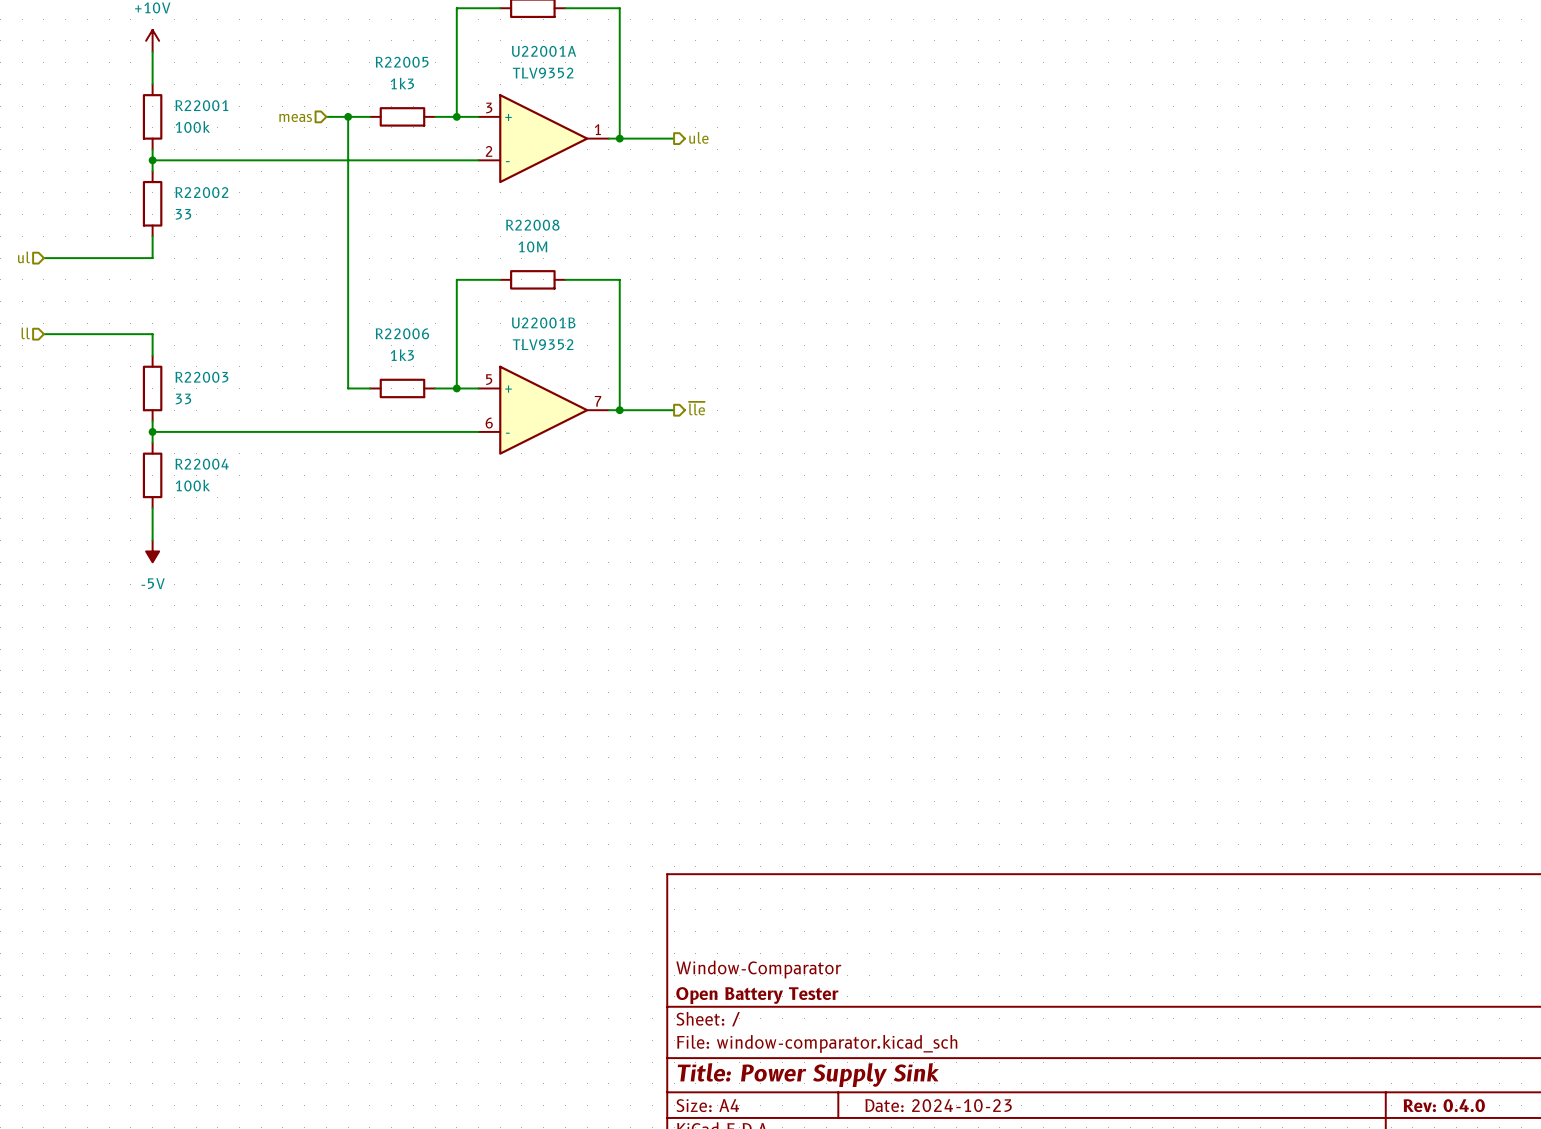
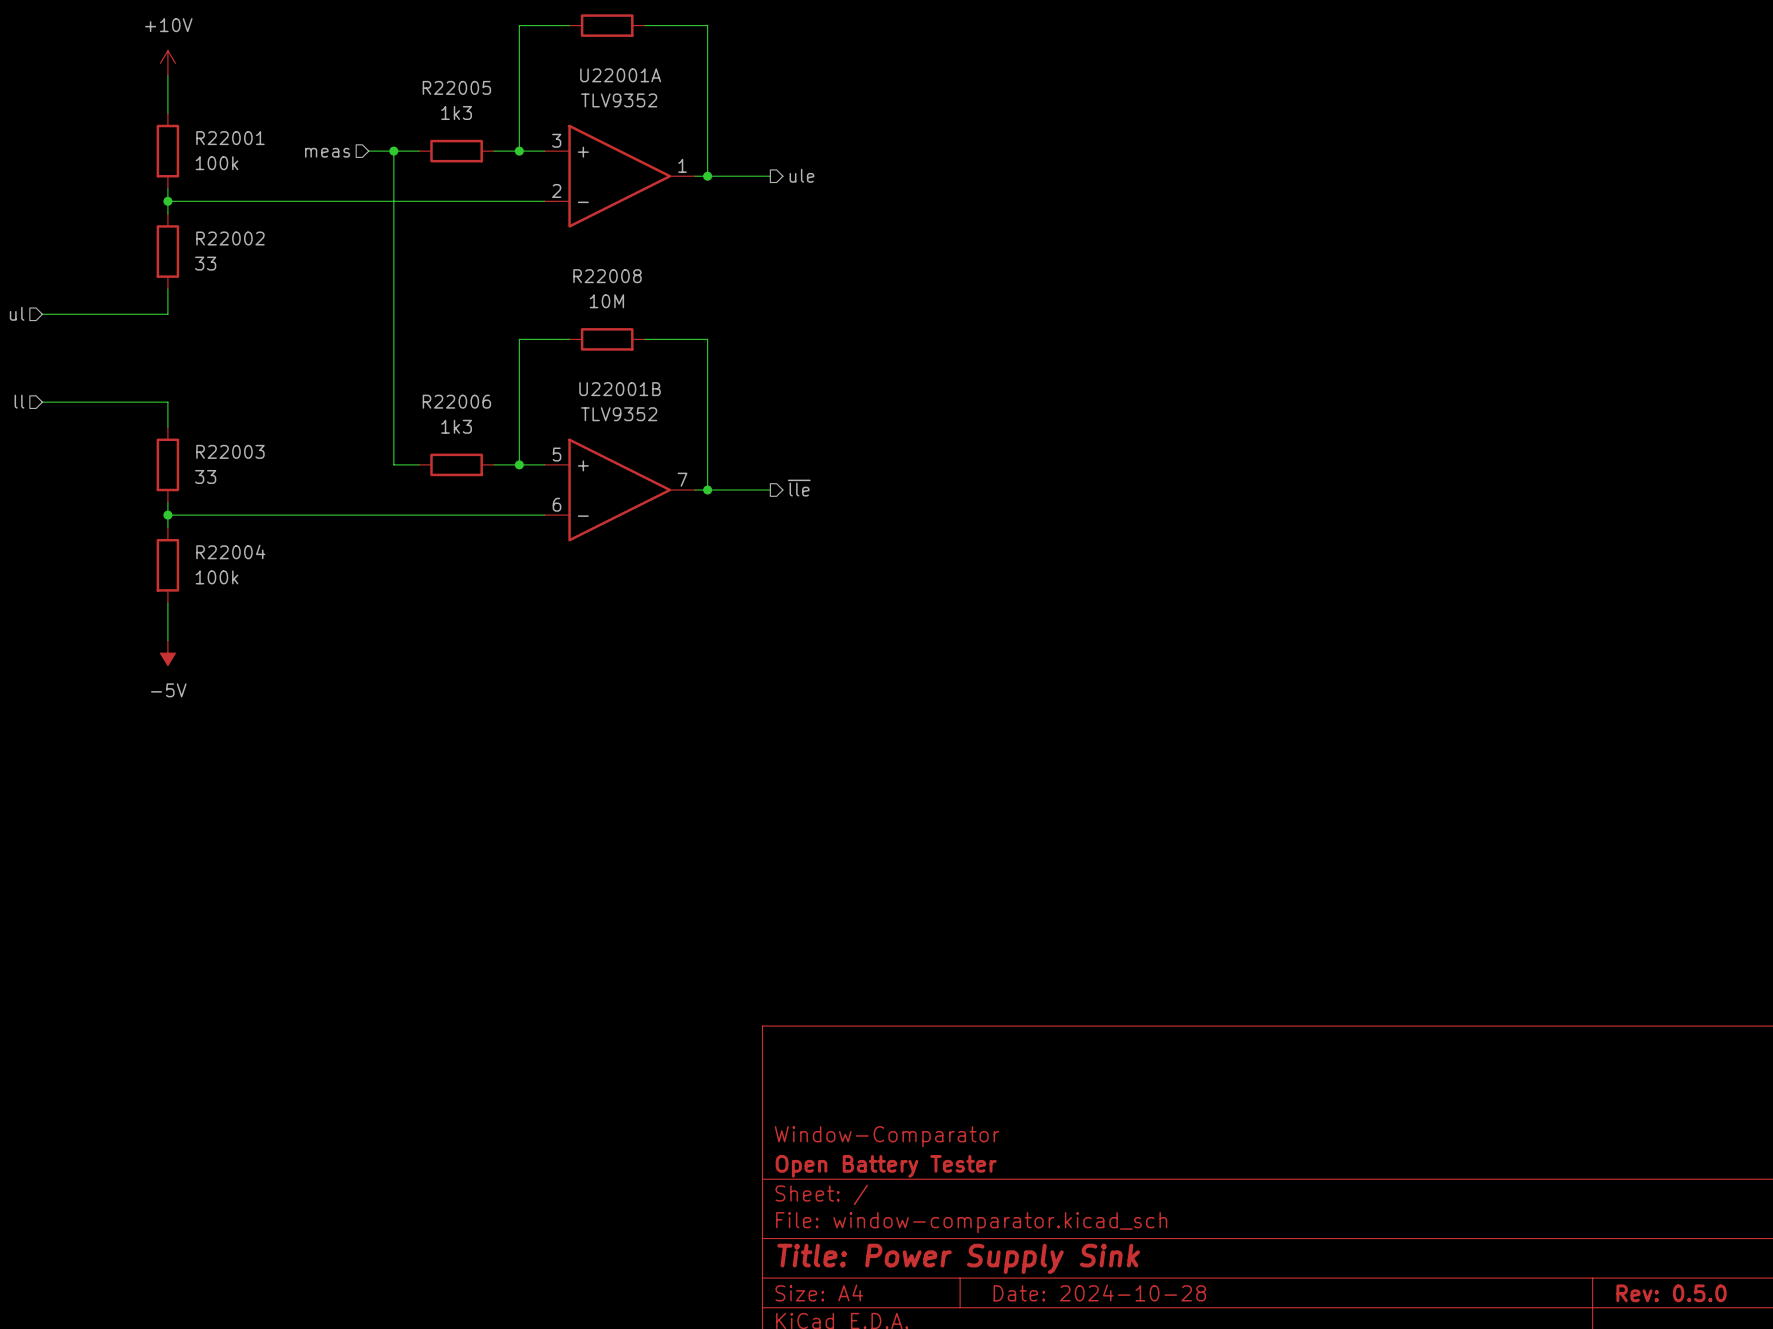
title block: Date: 2024-10-23 (938, 1105) -> Date: 2024-10-28 (1099, 1292)
title block: Rev: 0.4.0 (1444, 1105) -> Rev: 0.5.0 (1671, 1293)

